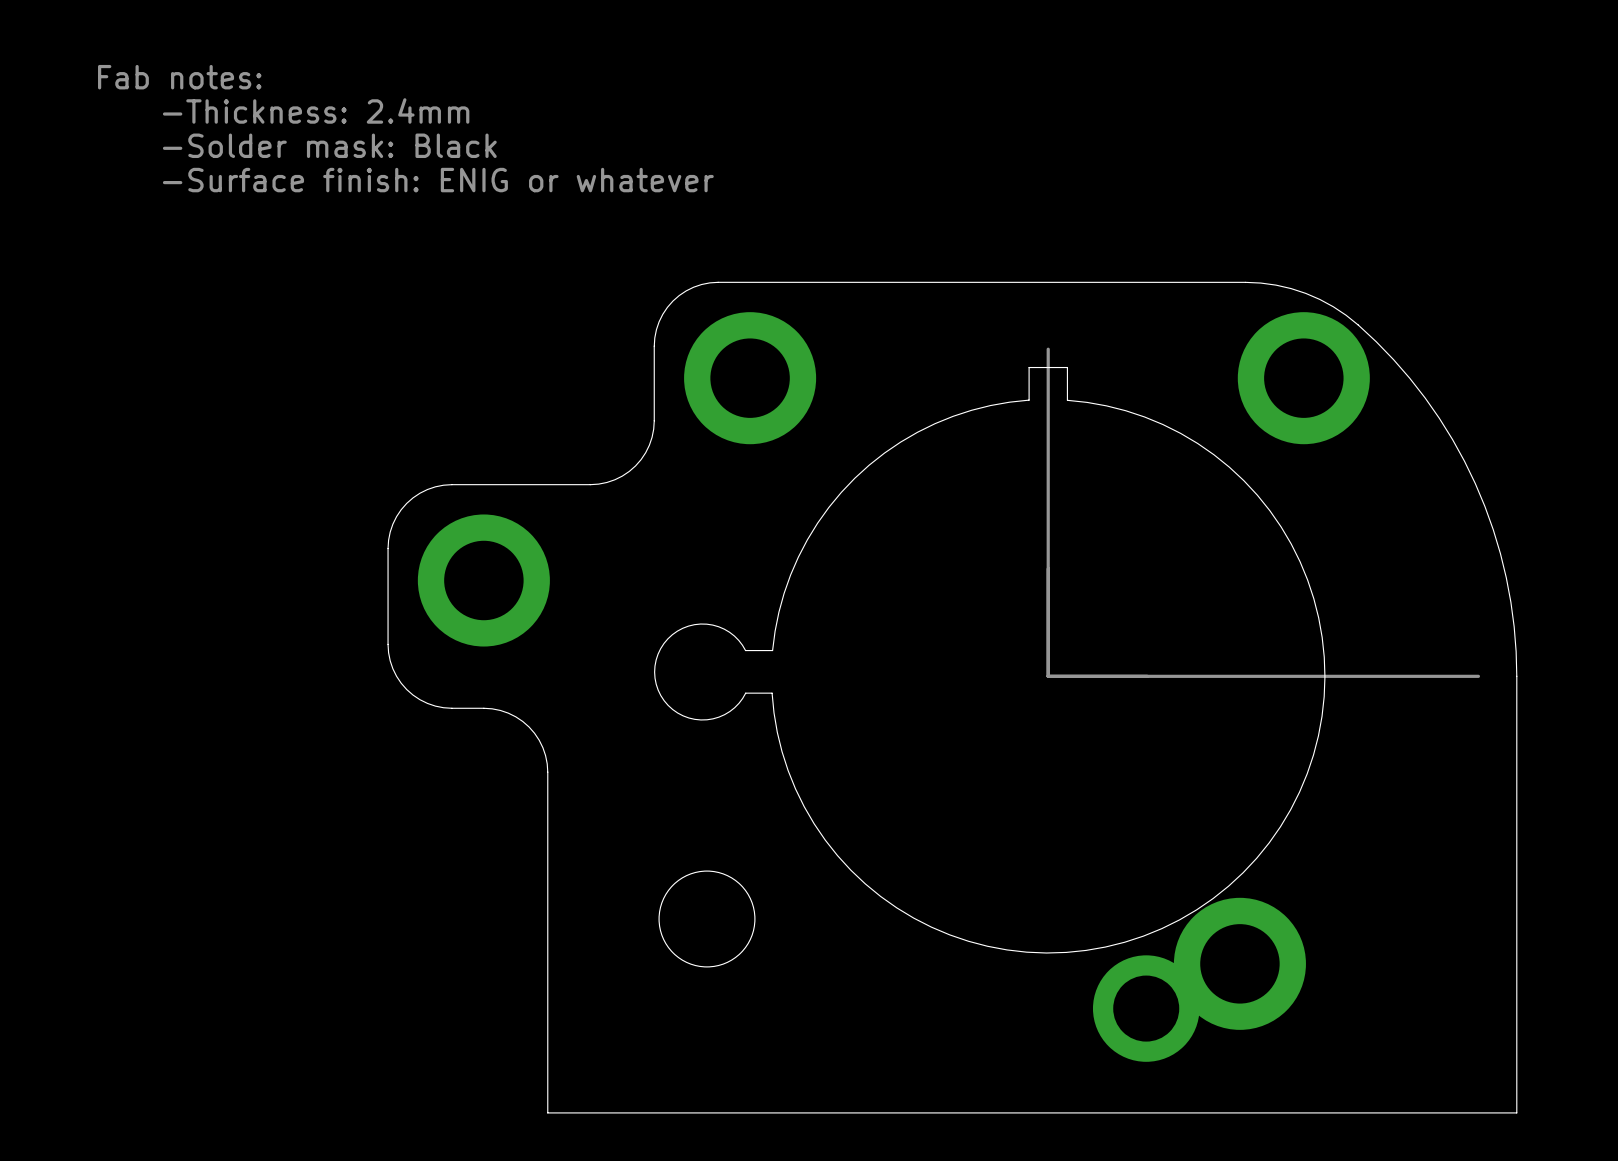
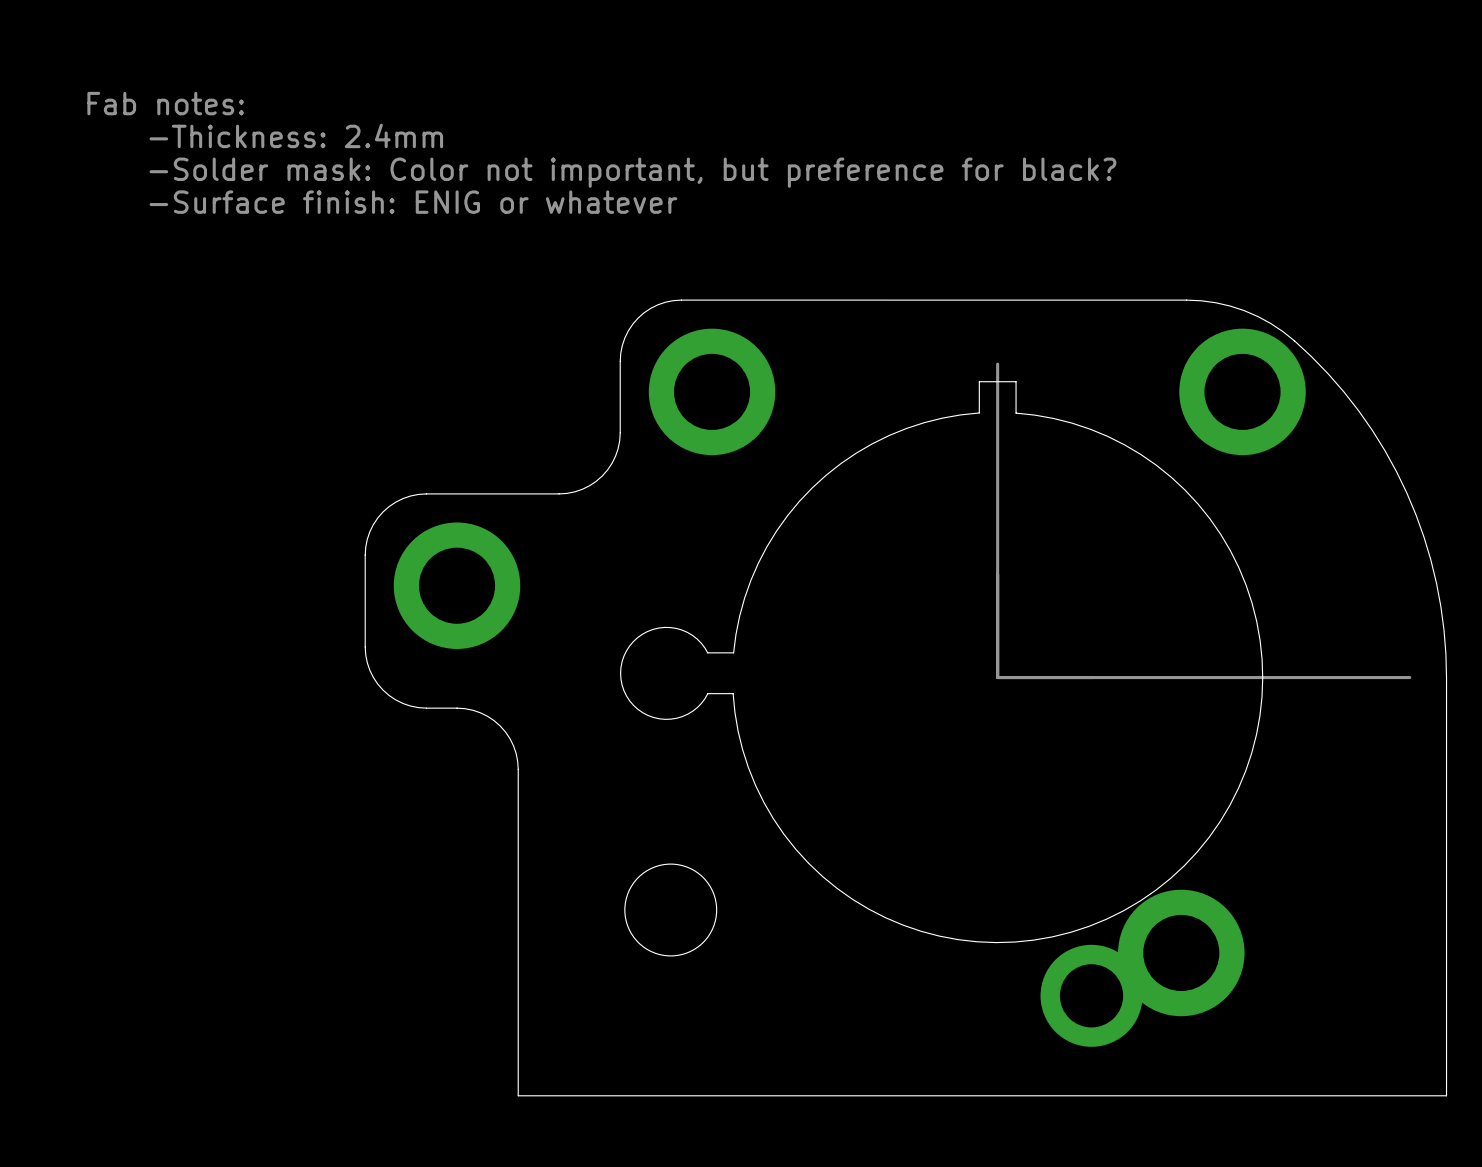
text: -Solder mask: Black (329, 145) -> -Solder mask: Color not important, but preference for black? (632, 172)

